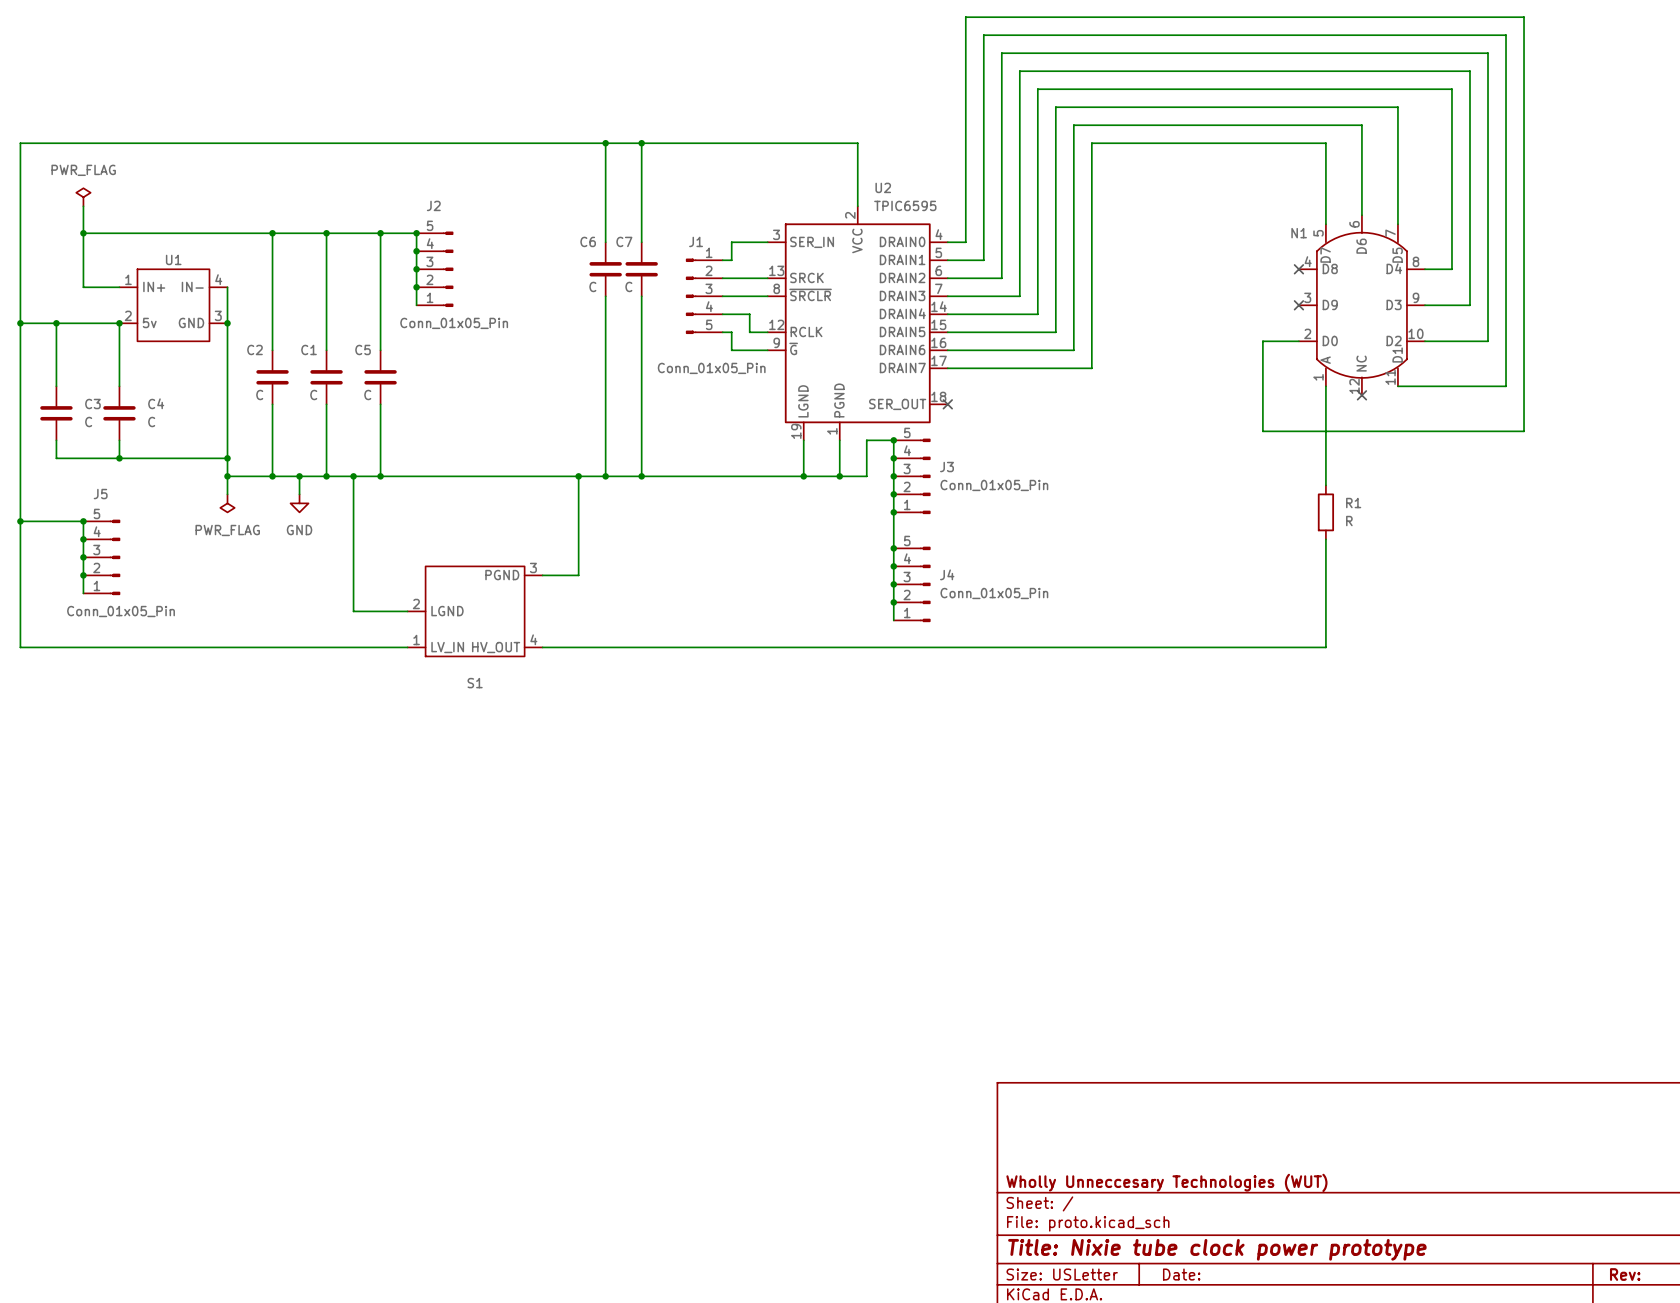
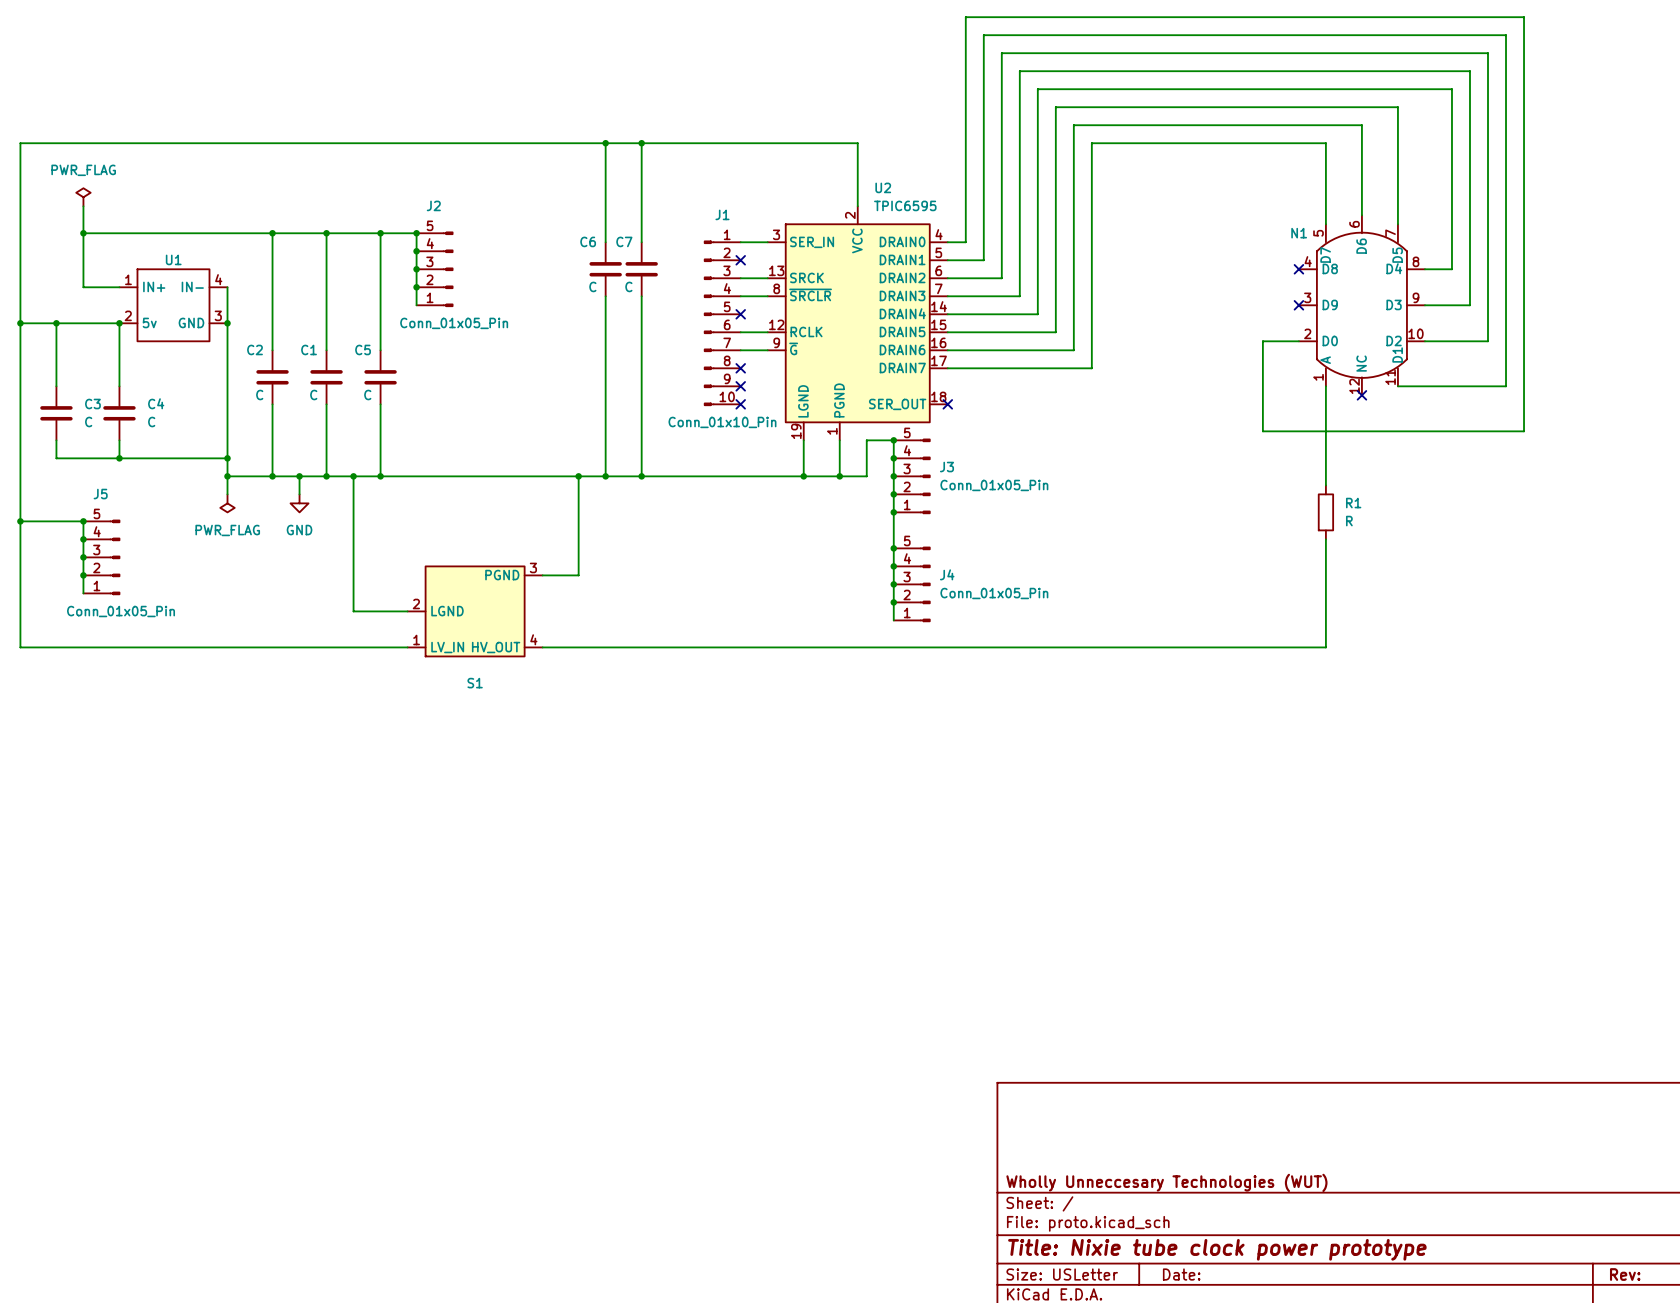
J1 name position: J1 (696, 241) -> J1 (722, 214)
J1 symbol: [686, 258, 723, 334] -> [704, 240, 741, 406]
no-connect mark: none -> (740, 260)
wire: (722, 314) (749, 314) (749, 332) -> (740, 332) (749, 332)
no-connect mark: none -> (740, 314)
J1 value: Conn_01x05_Pin (711, 368) -> Conn_01x10_Pin (722, 422)
no-connect mark: none -> (740, 368)
no-connect mark: none -> (740, 386)
no-connect mark: none -> (740, 404)

